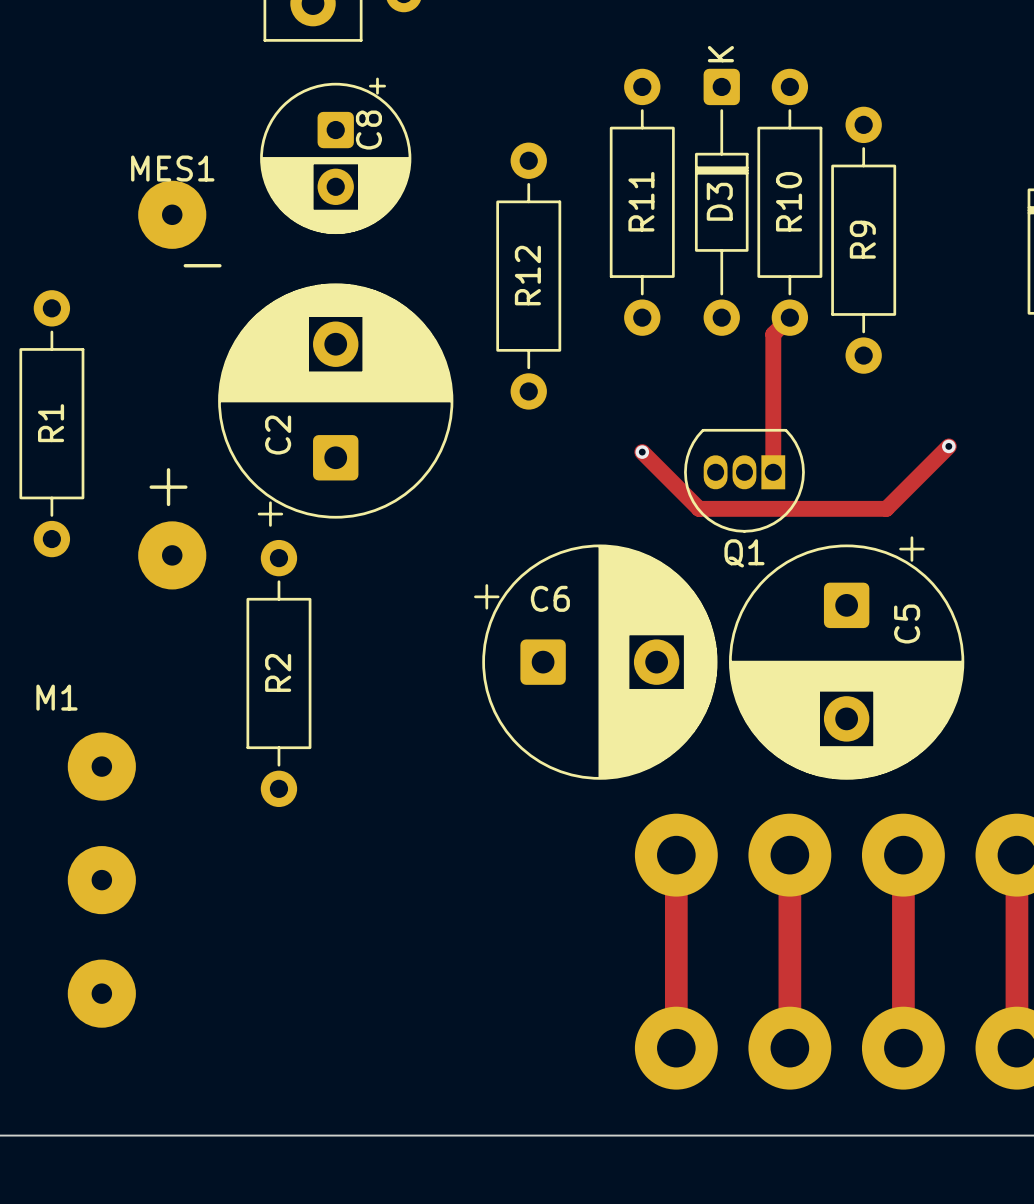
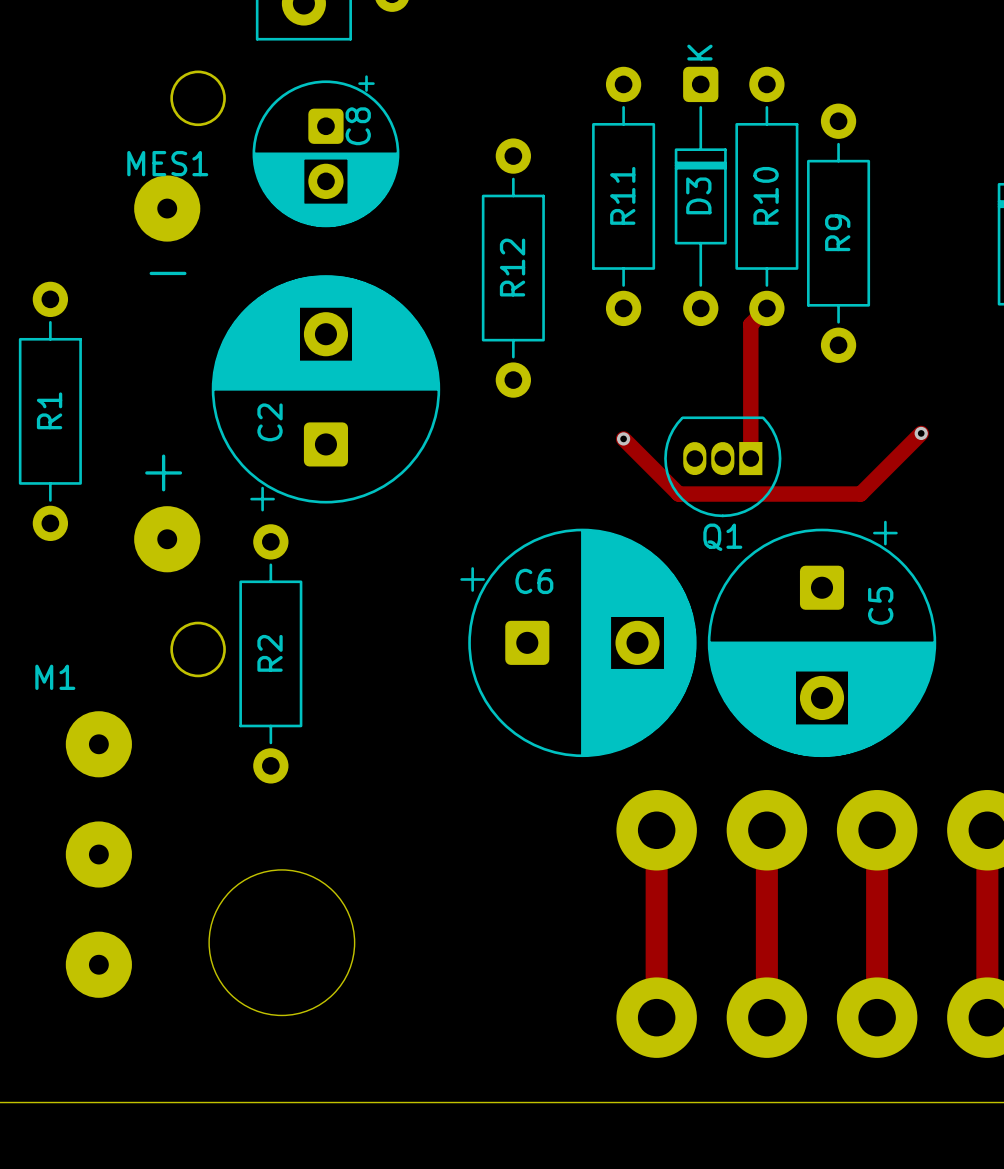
MES1 footprint: [138, 180, 207, 590] -> [134, 70, 226, 678]
round board edge: none -> [208, 869, 356, 1017]

